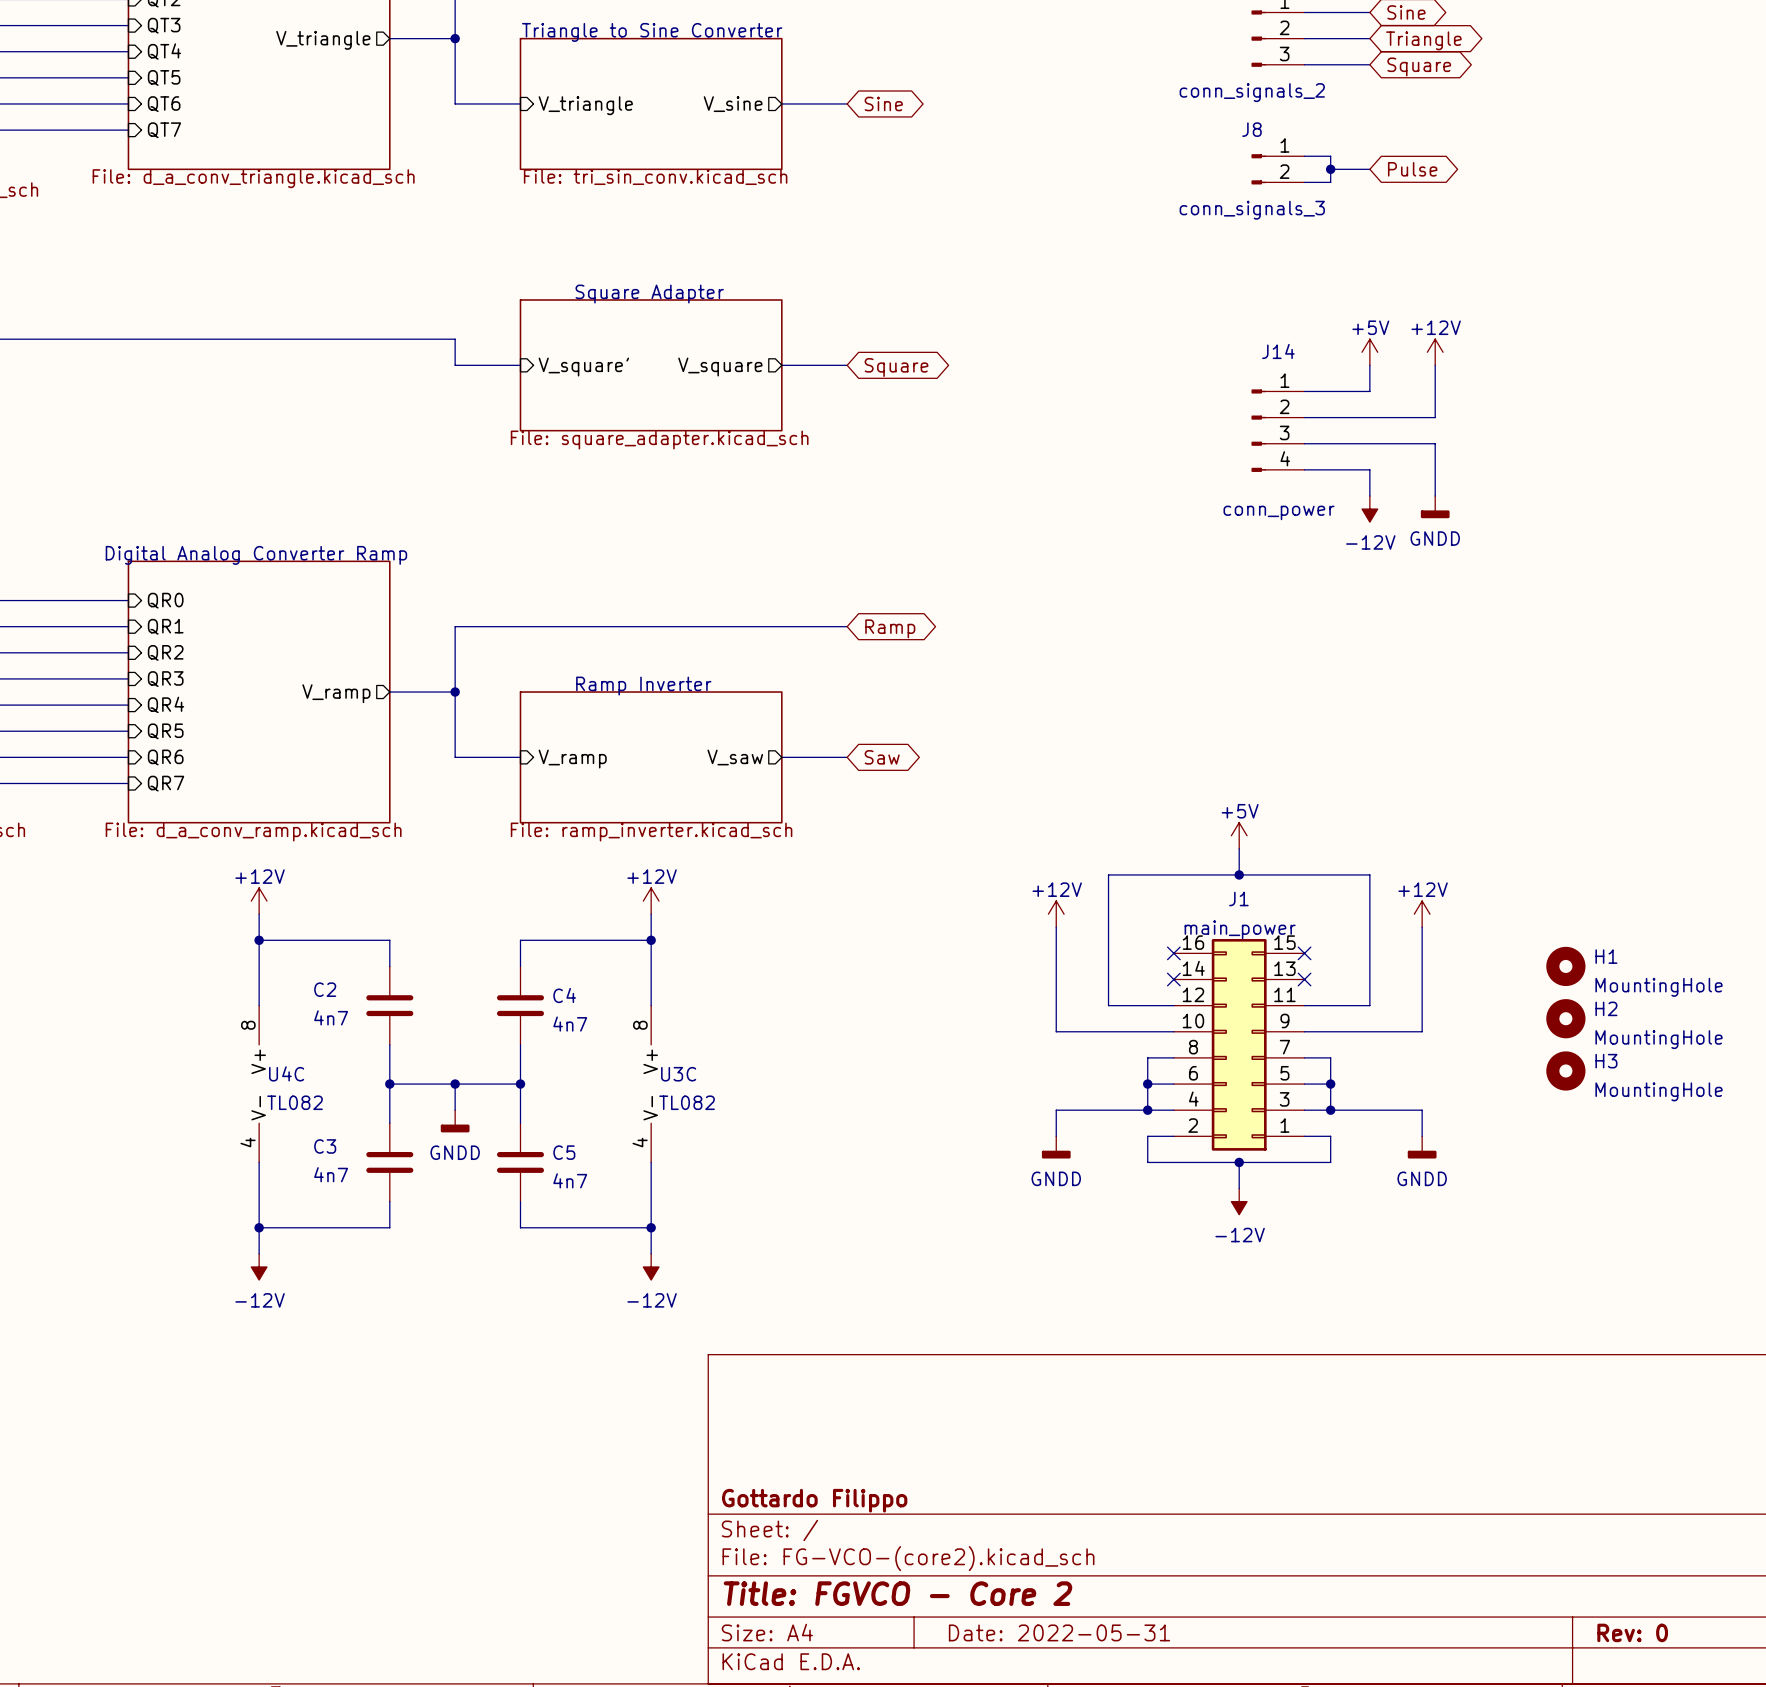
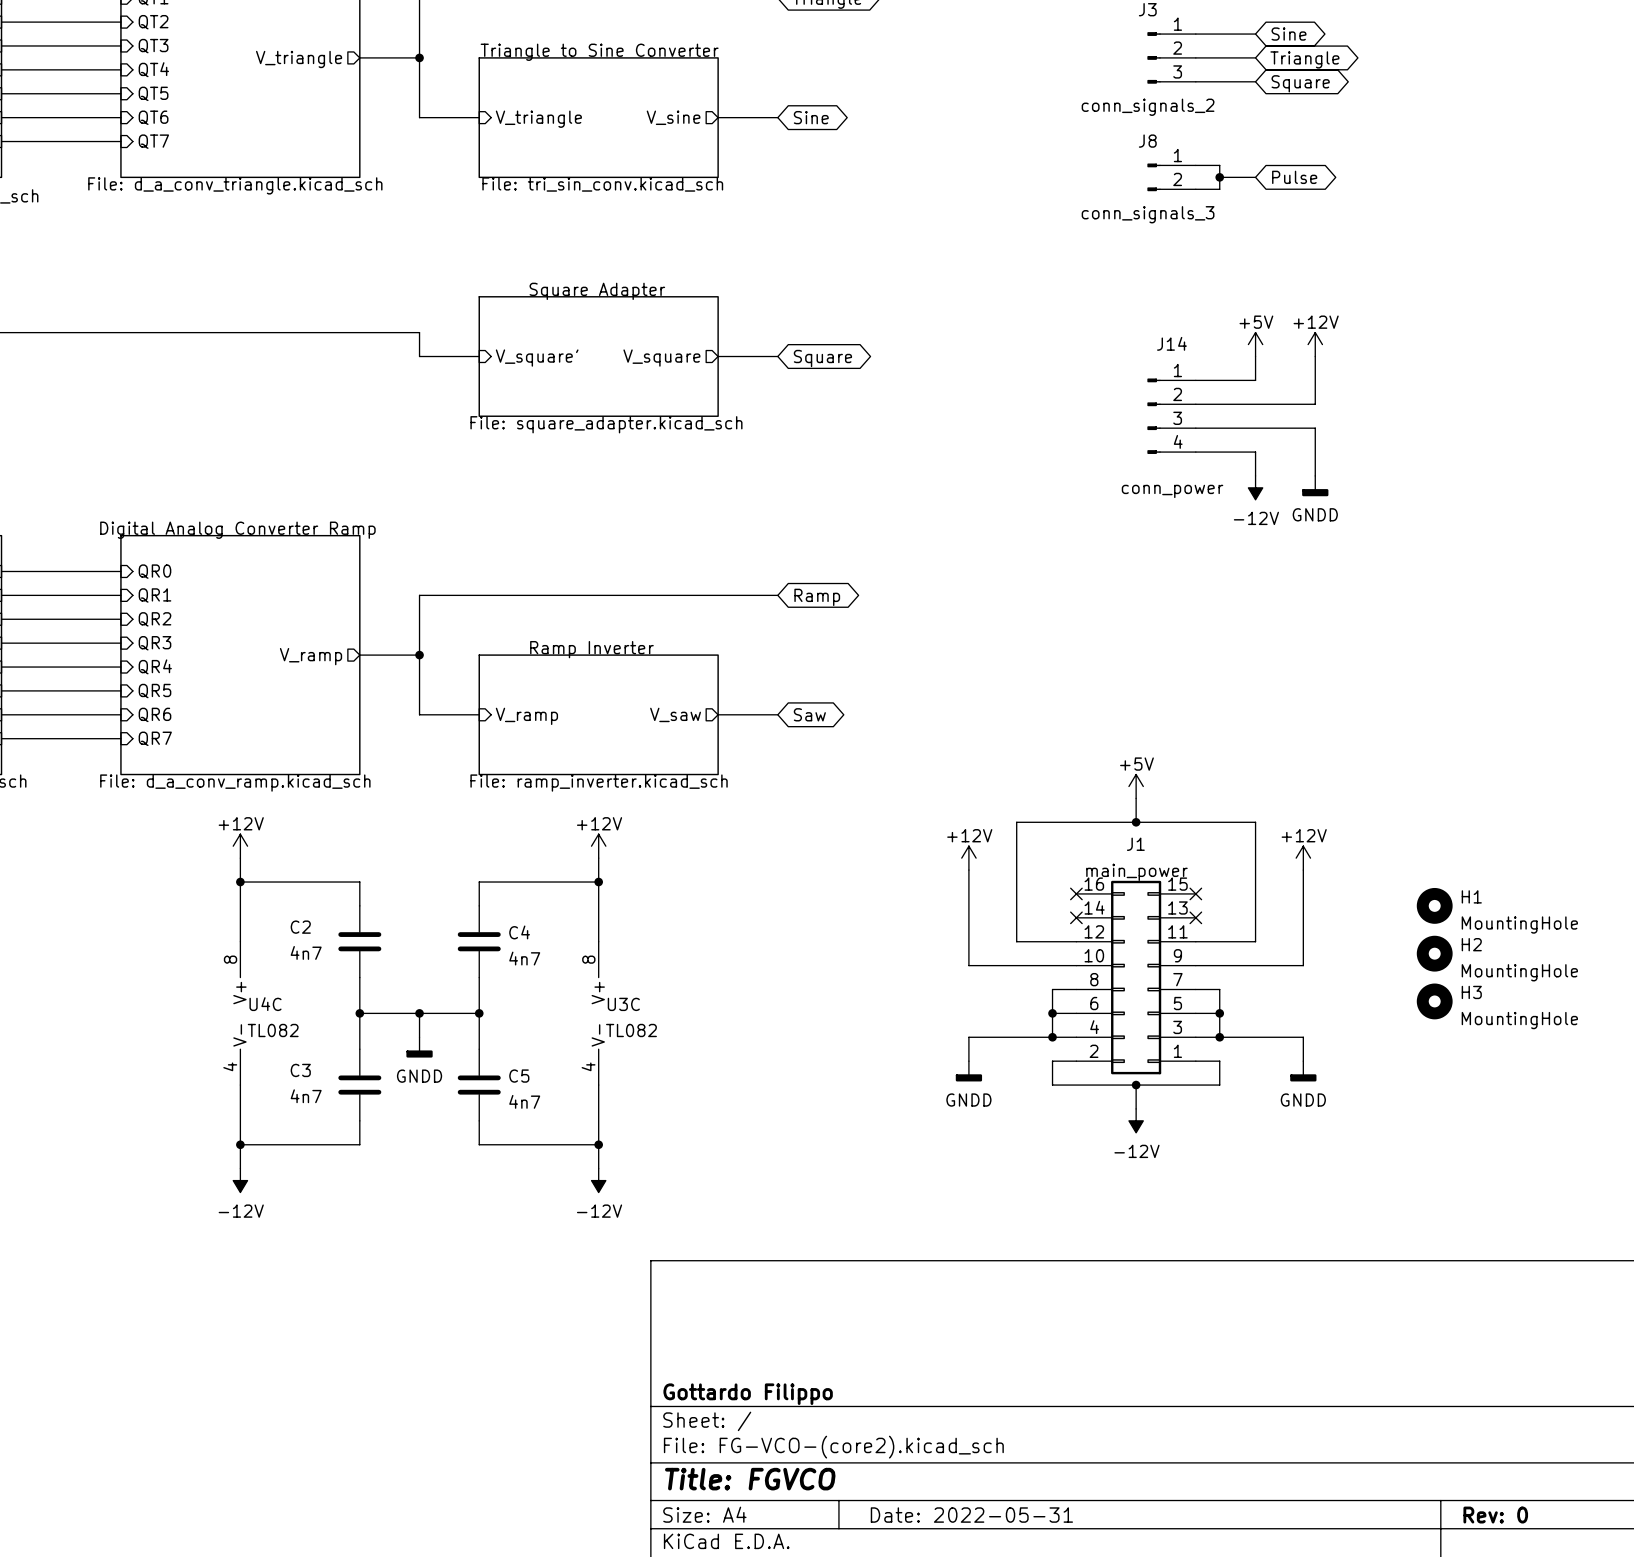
title block: Title: FGVCO - Core 2 (898, 1593) -> Title: FGVCO (750, 1479)

